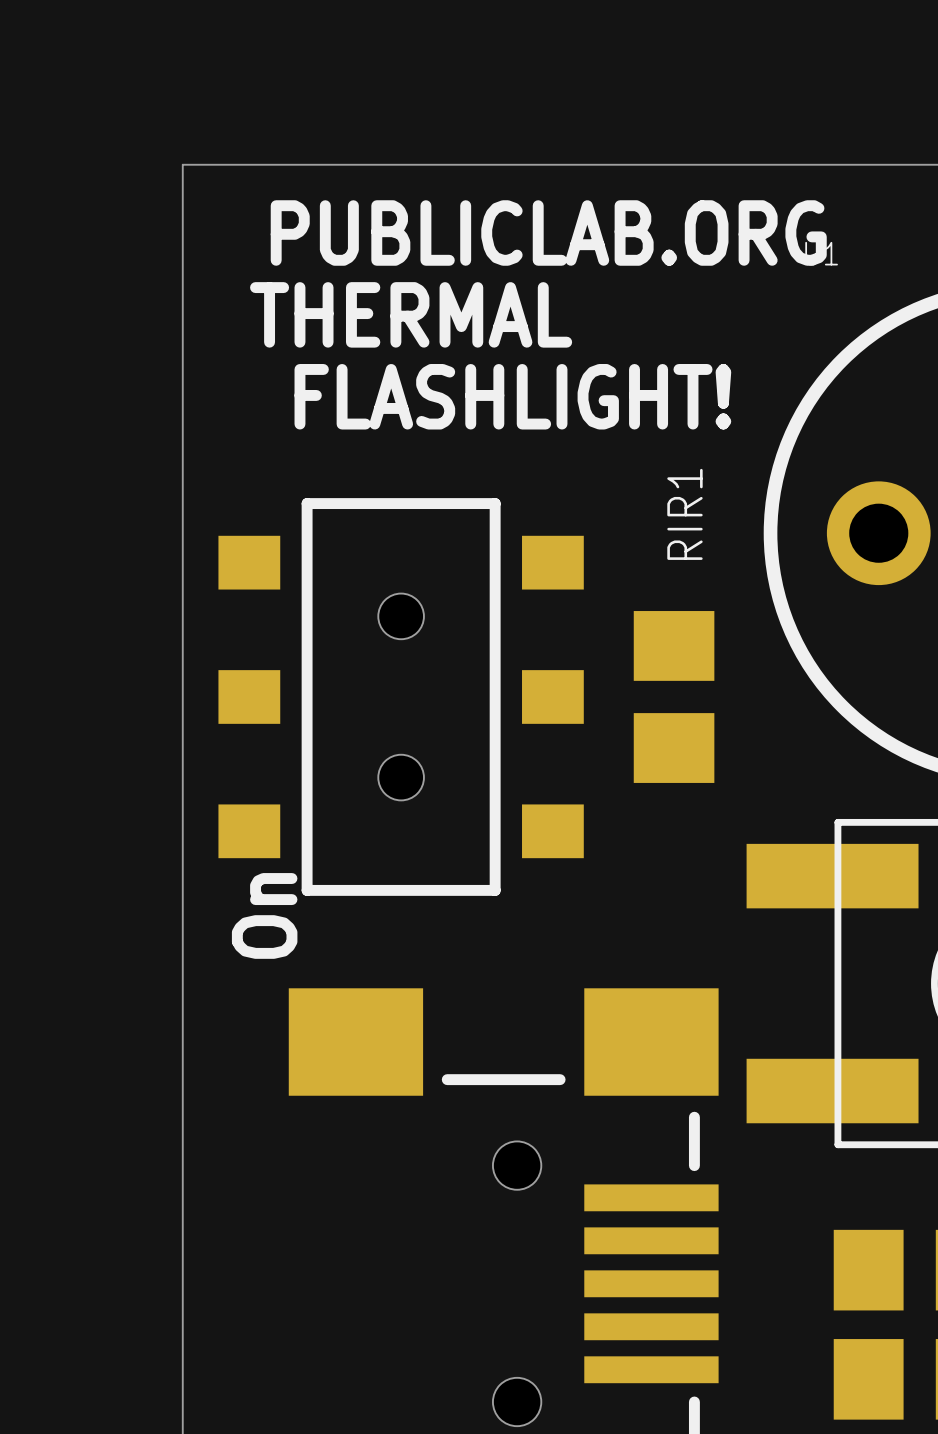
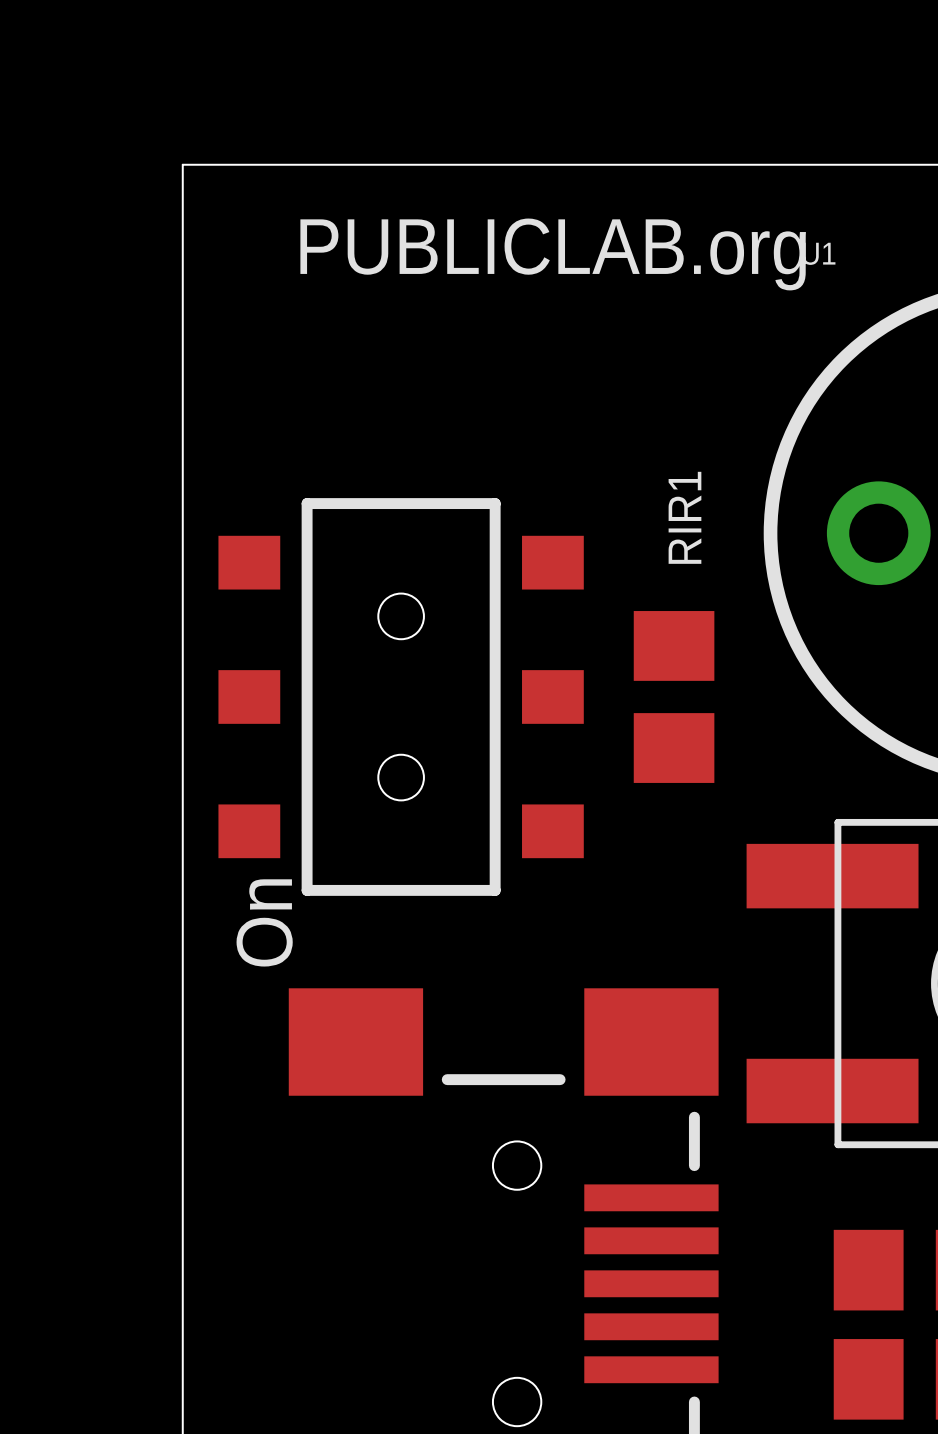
text: PUBLICLAB.ORG (548, 232) -> PUBLICLAB.org (553, 254)
text: THERMAL (411, 314) -> none
text: FLASHLIGHT! (512, 396) -> none

